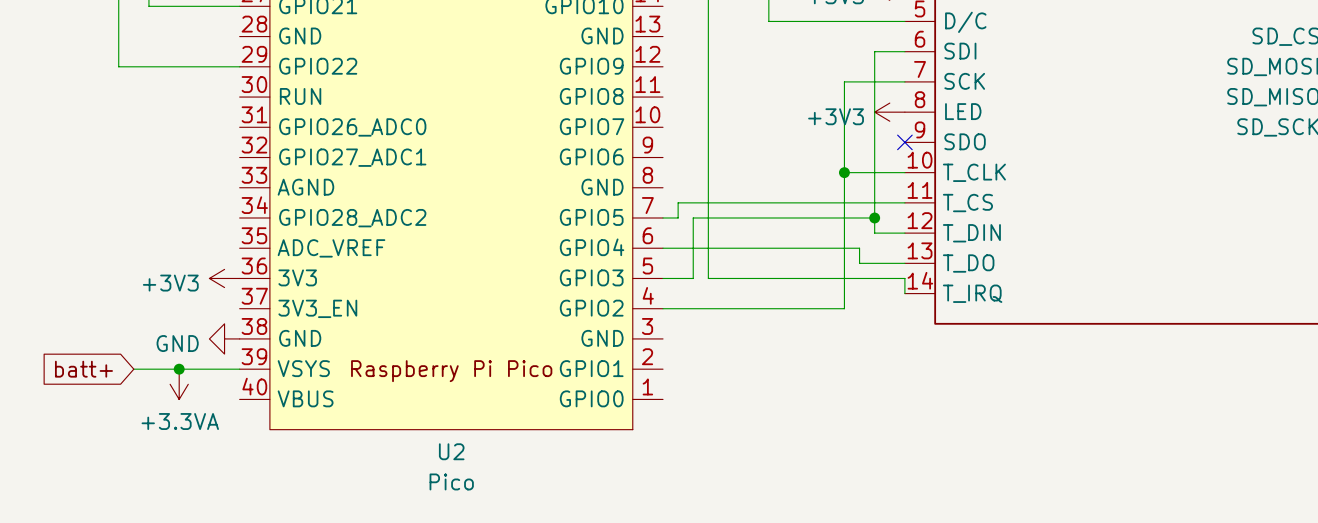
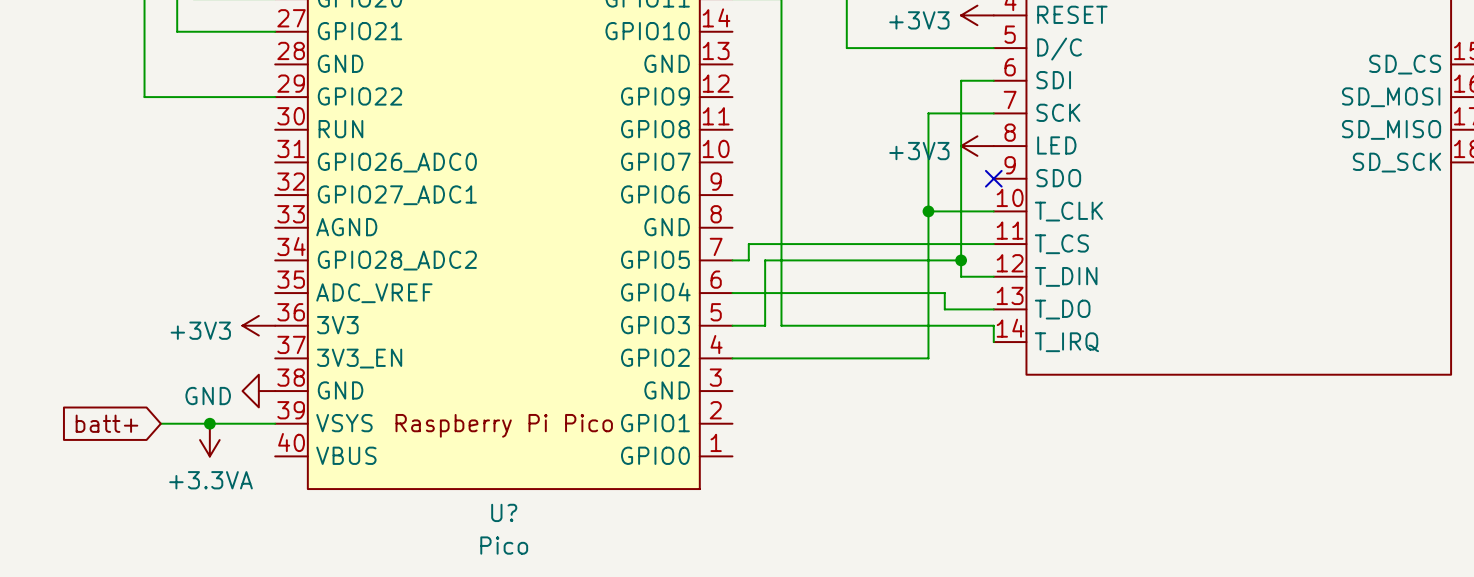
U2 name: U2 (451, 451) -> U? (504, 512)

